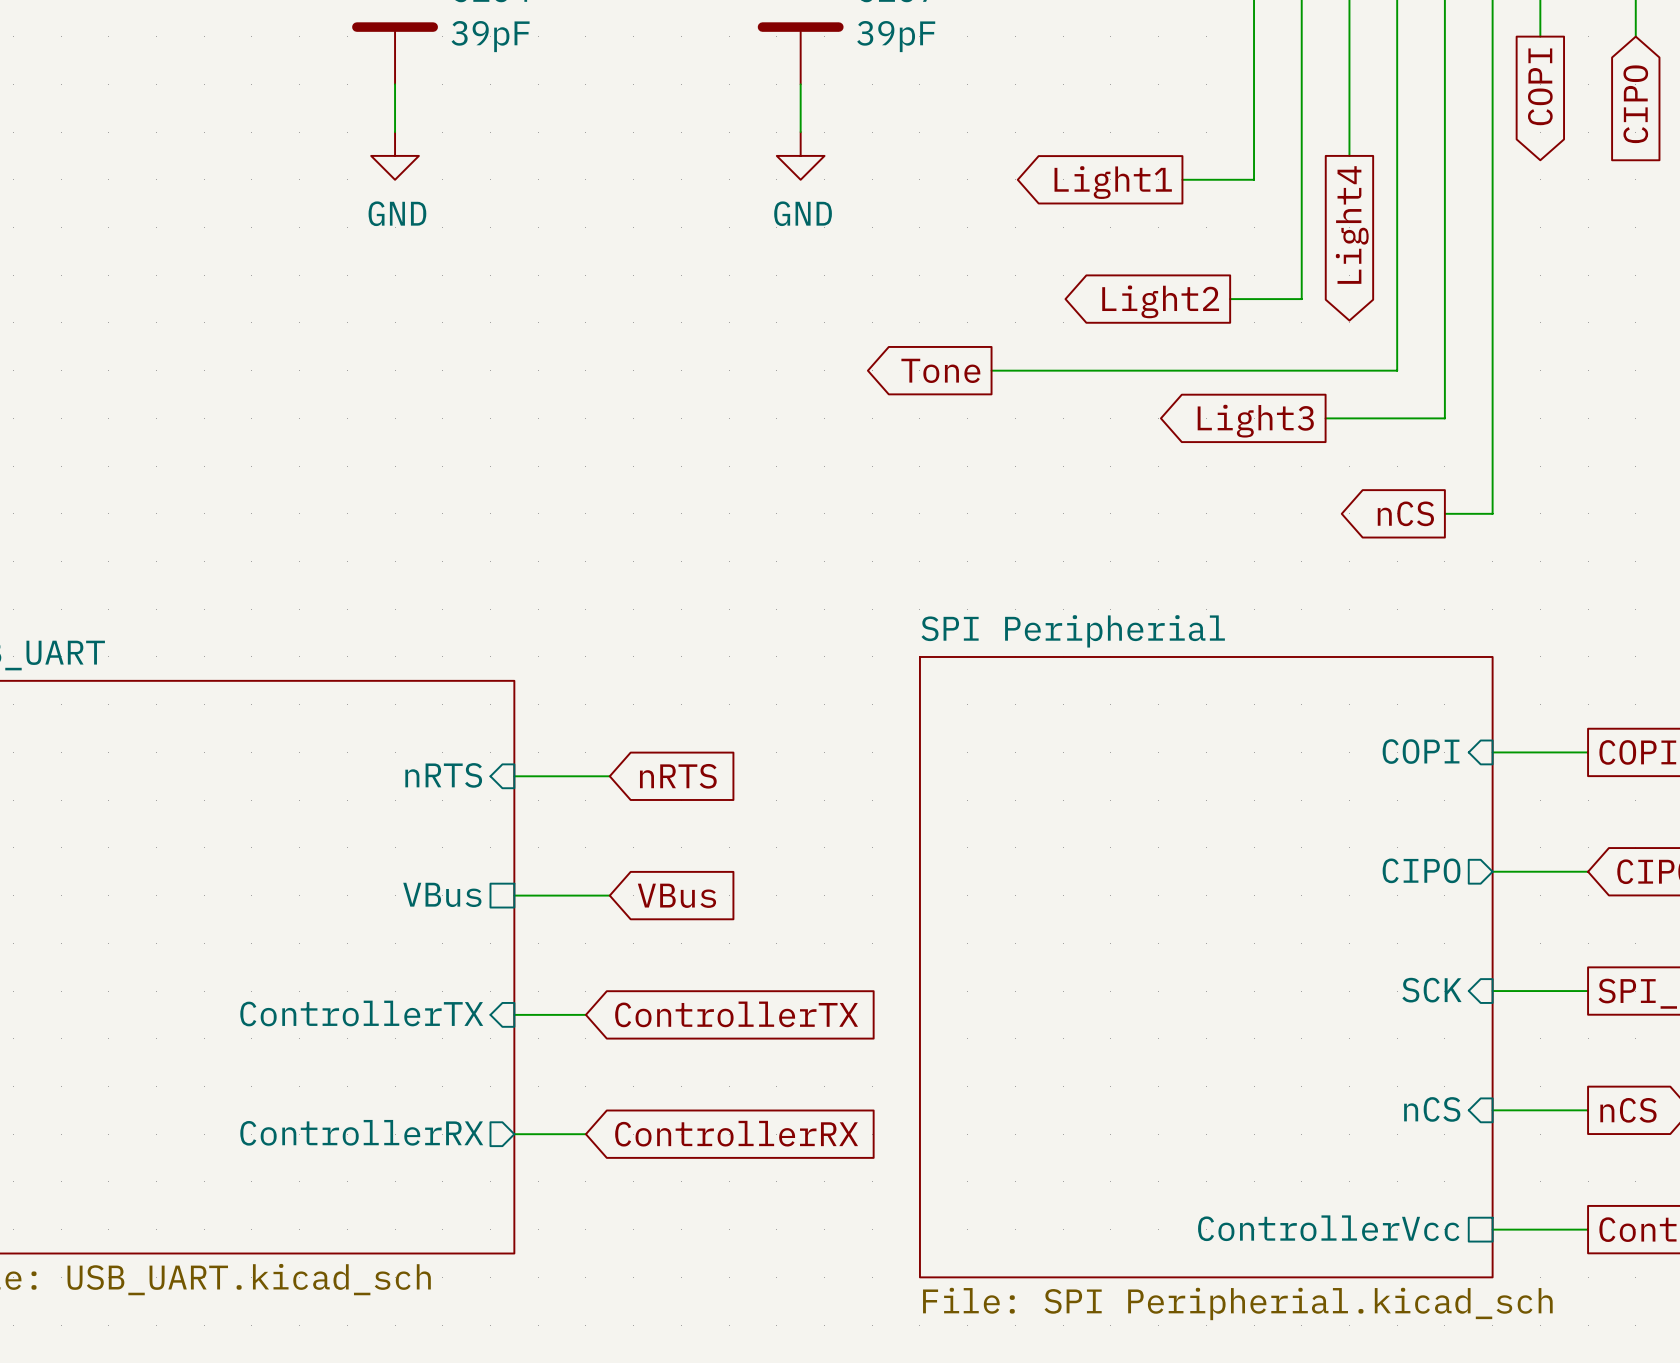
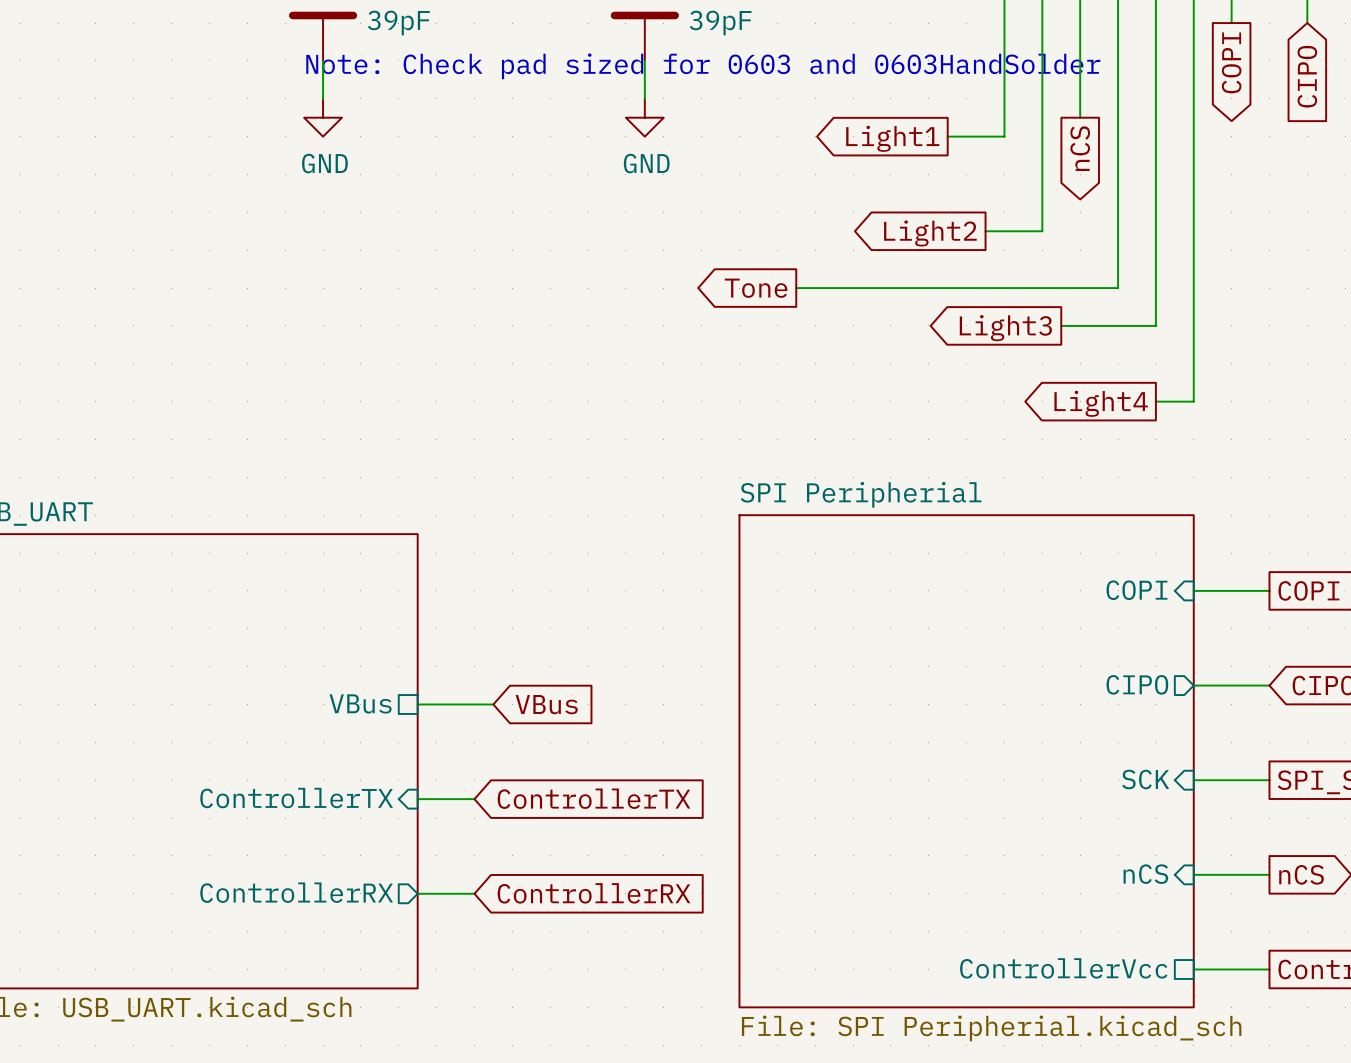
text: none -> Note: Check pad sized for 0603 and 0603HandSolder (703, 66)
global label: Light4 (1352, 225) -> nCS (1080, 148)
global label: nCS (1405, 513) -> Light4 (1101, 403)
sheet pin: nRTS (443, 775) -> none
wire: (514, 776) (609, 776) -> none
global label: nRTS (678, 776) -> none

